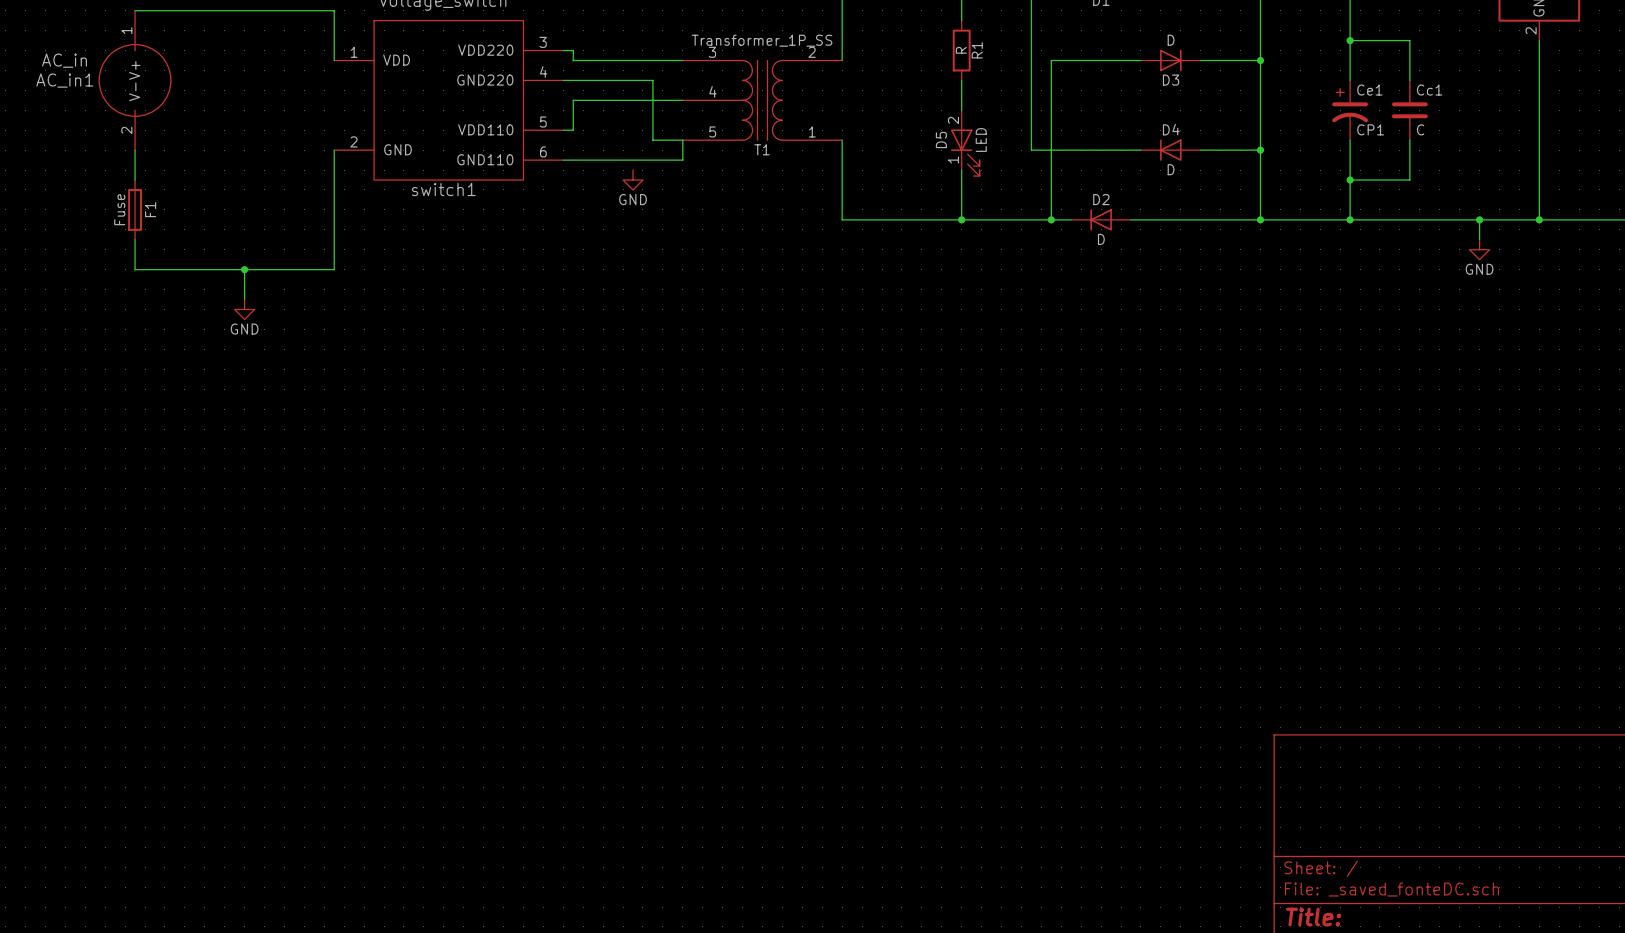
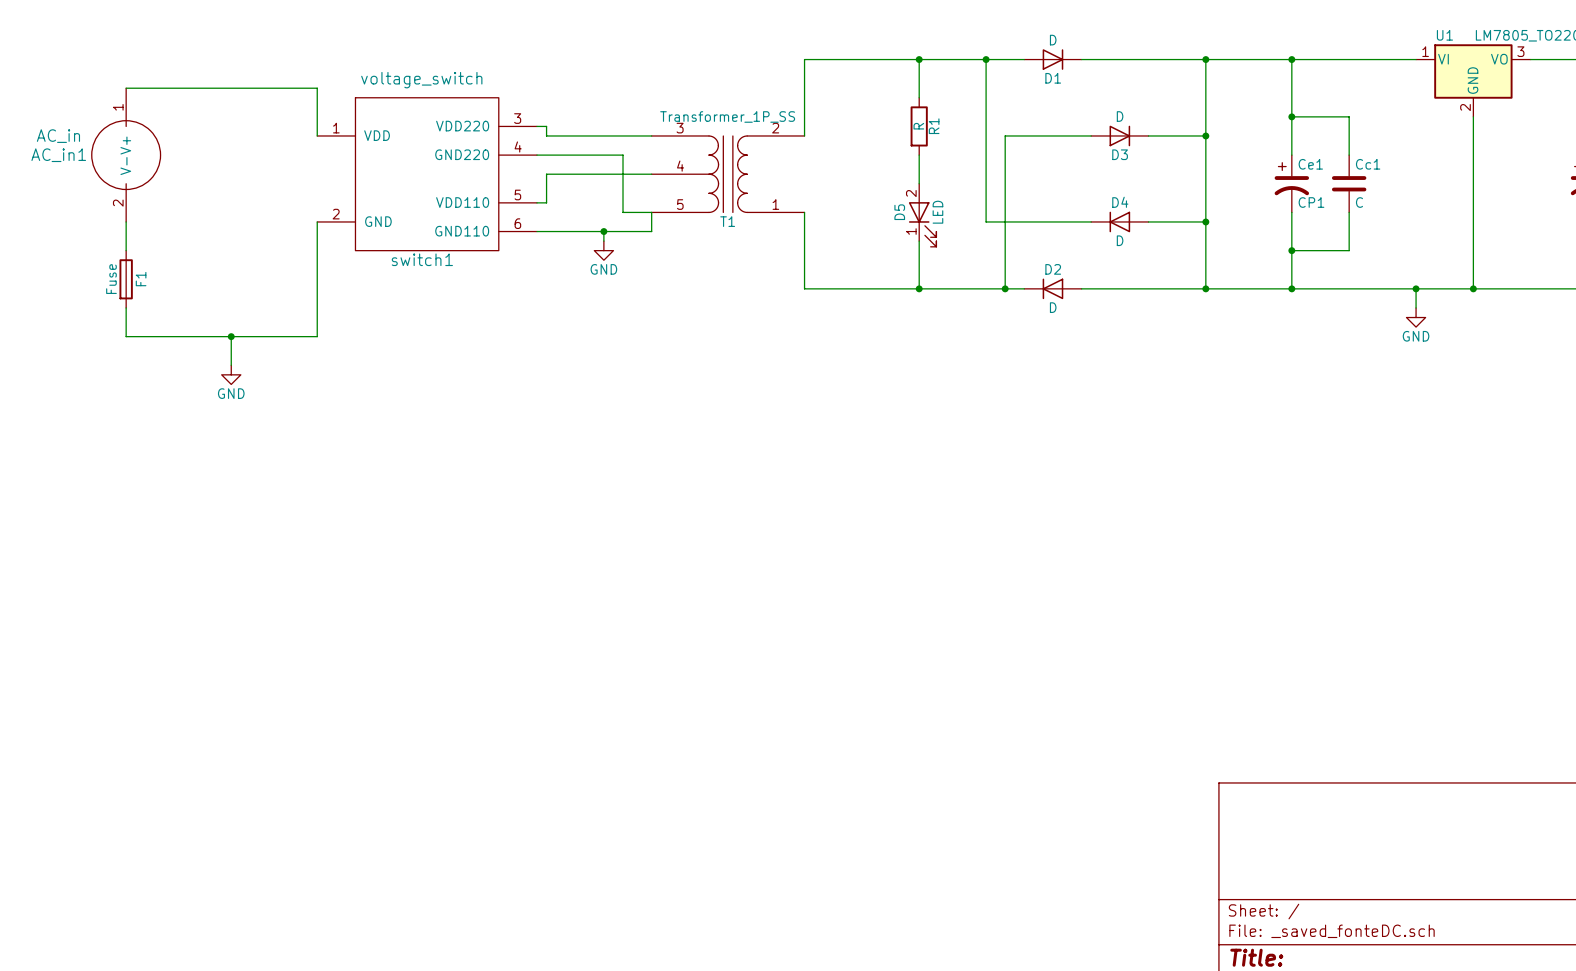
wire: none -> (603, 231) (603, 241)
junction: none -> (603, 231)

